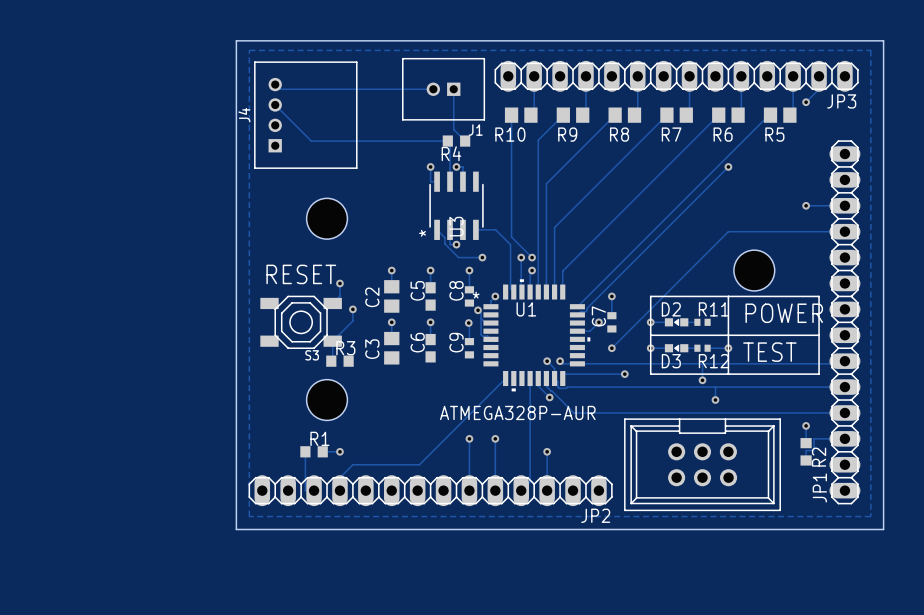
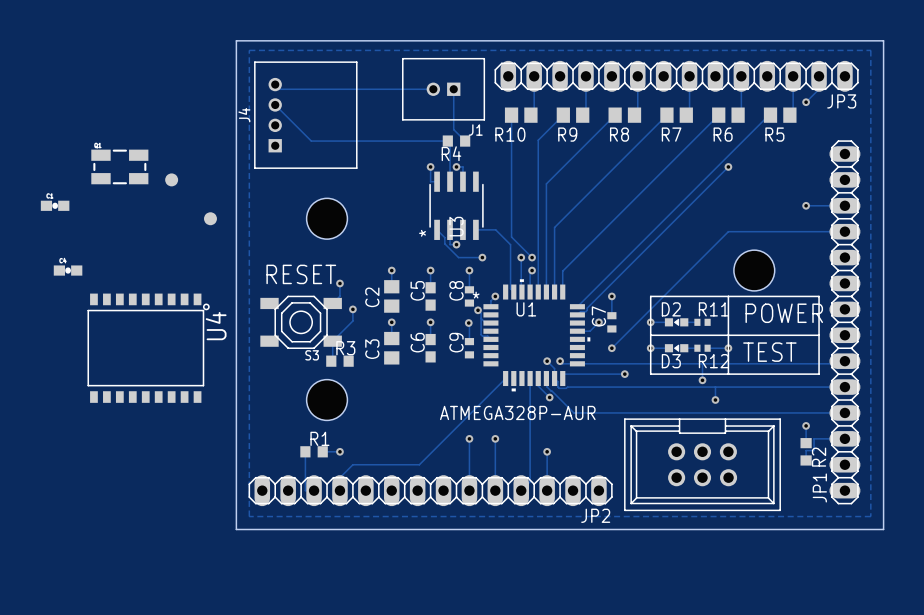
part: none -> (119, 166)
part: none -> (171, 179)
part: none -> (55, 205)
part: none -> (210, 218)
part: none -> (68, 270)
U4: none -> (148, 348)

